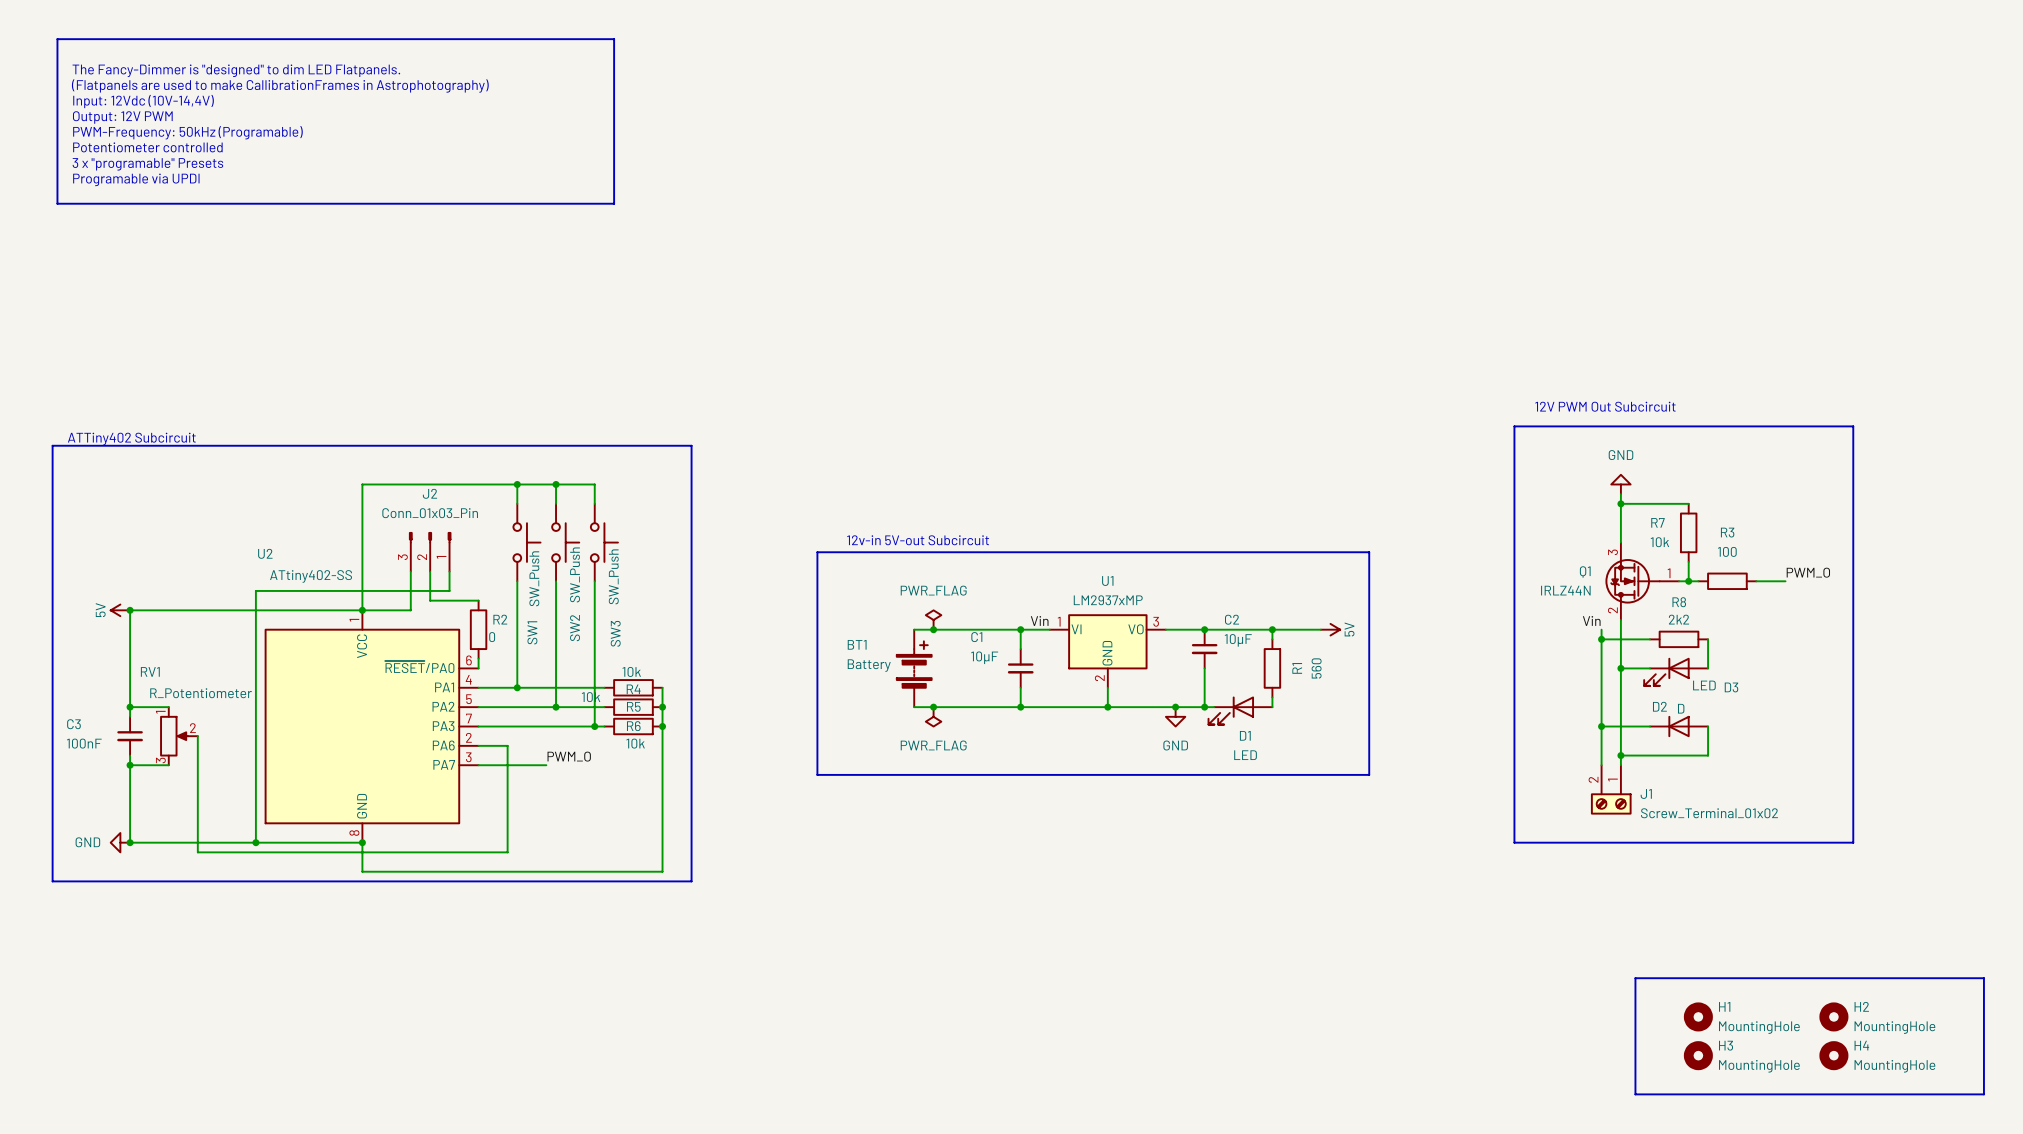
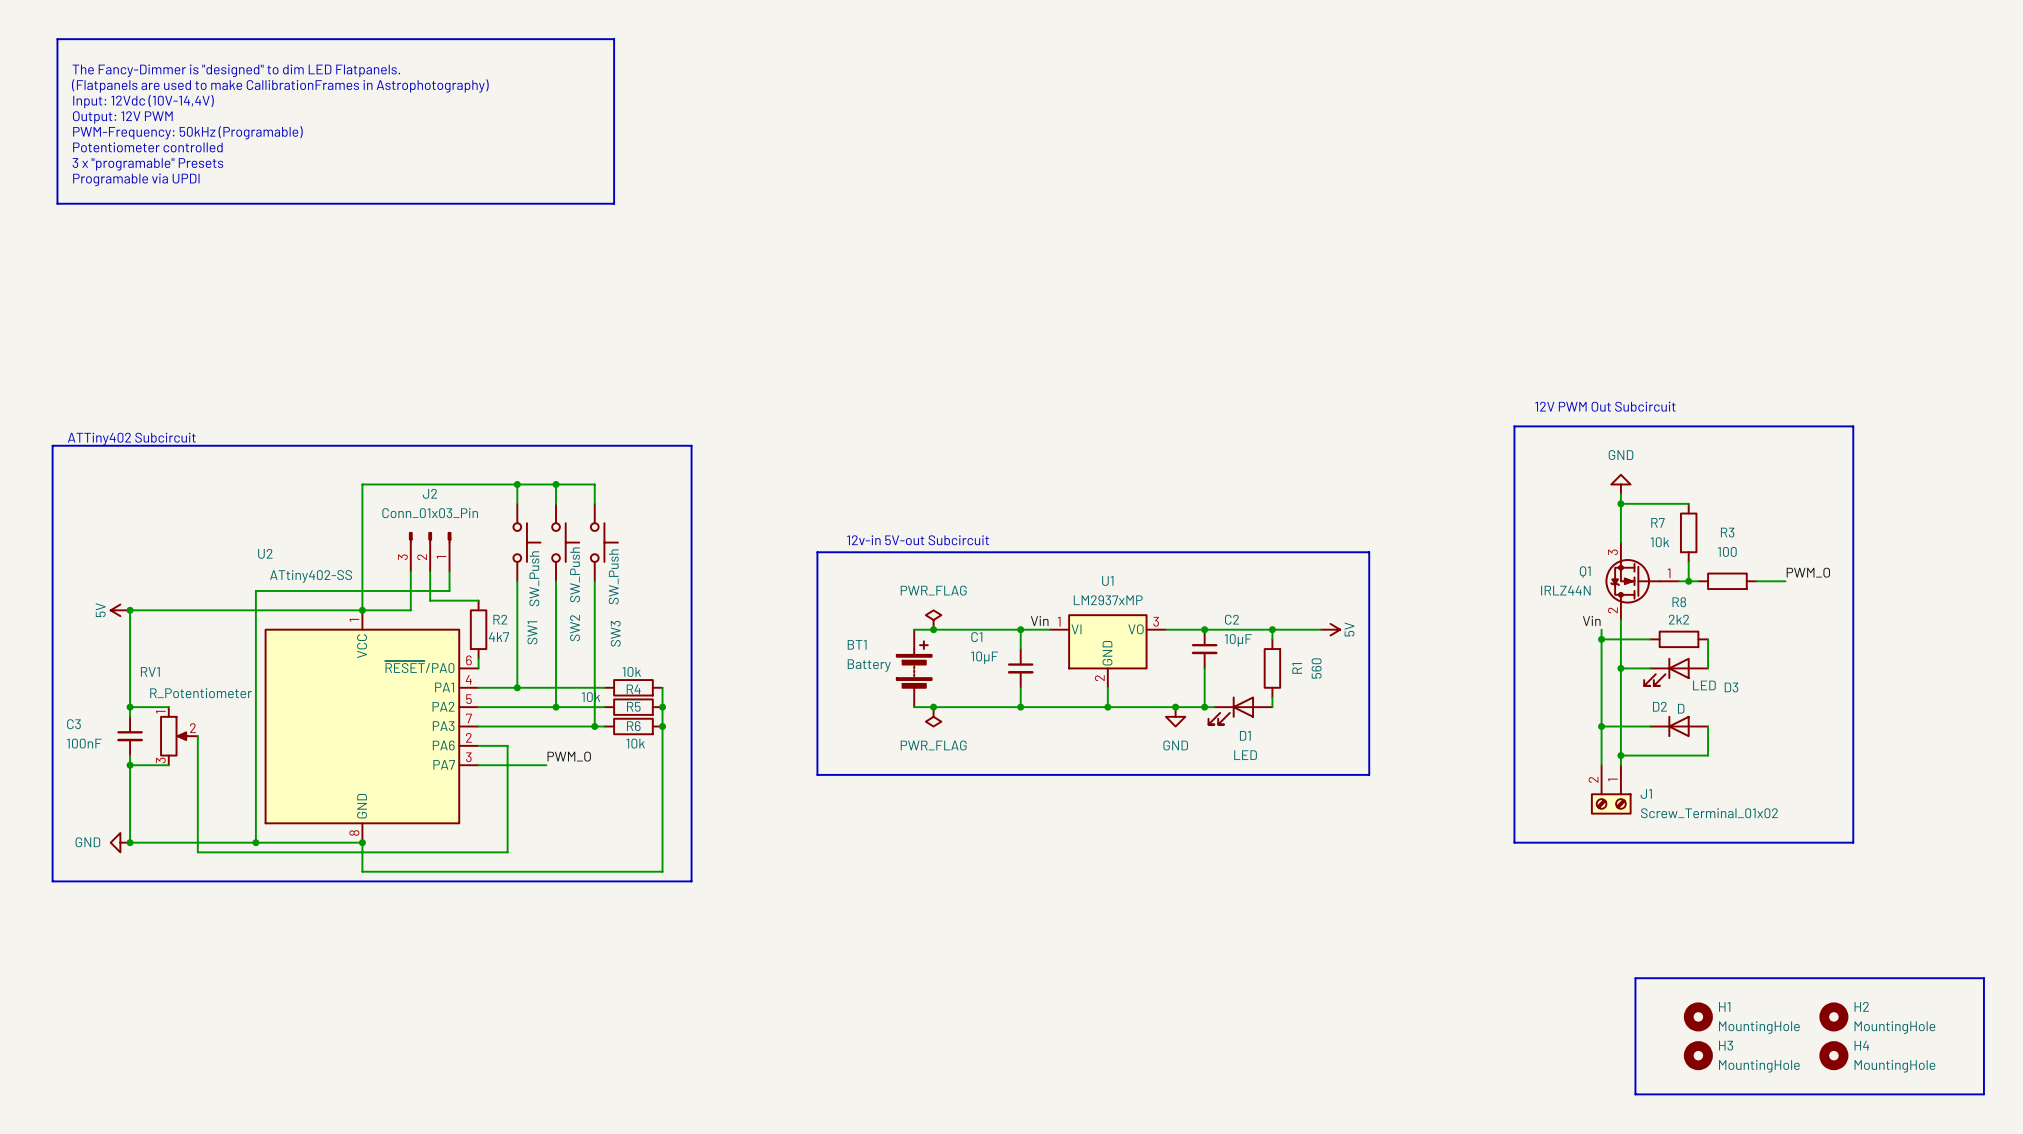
R2 value: 0 (492, 637) -> 4k7 (498, 637)

